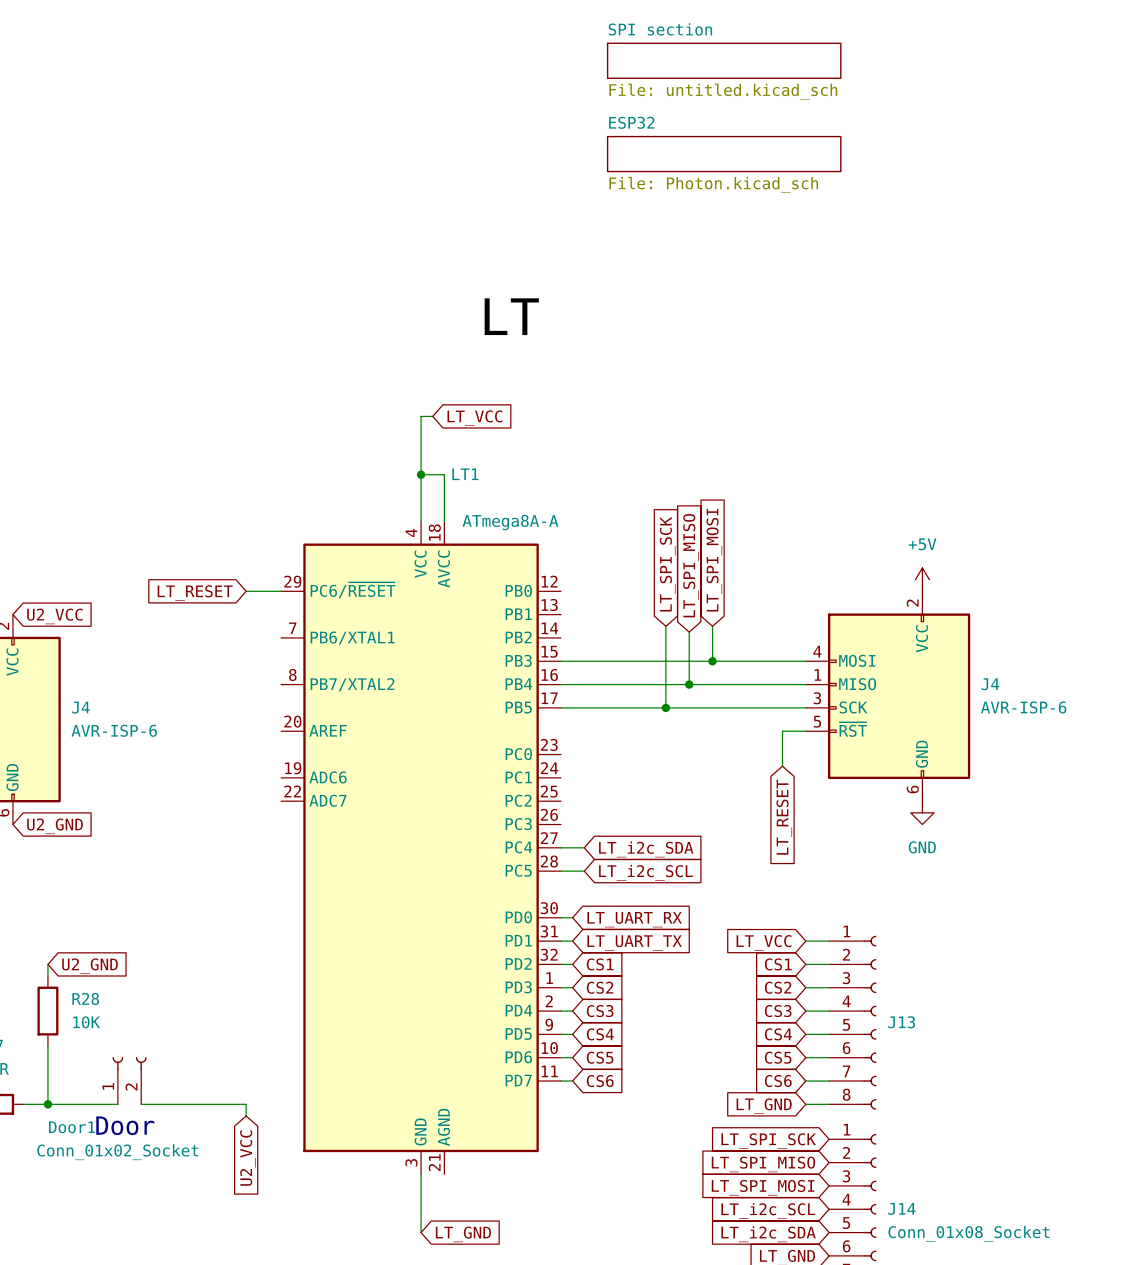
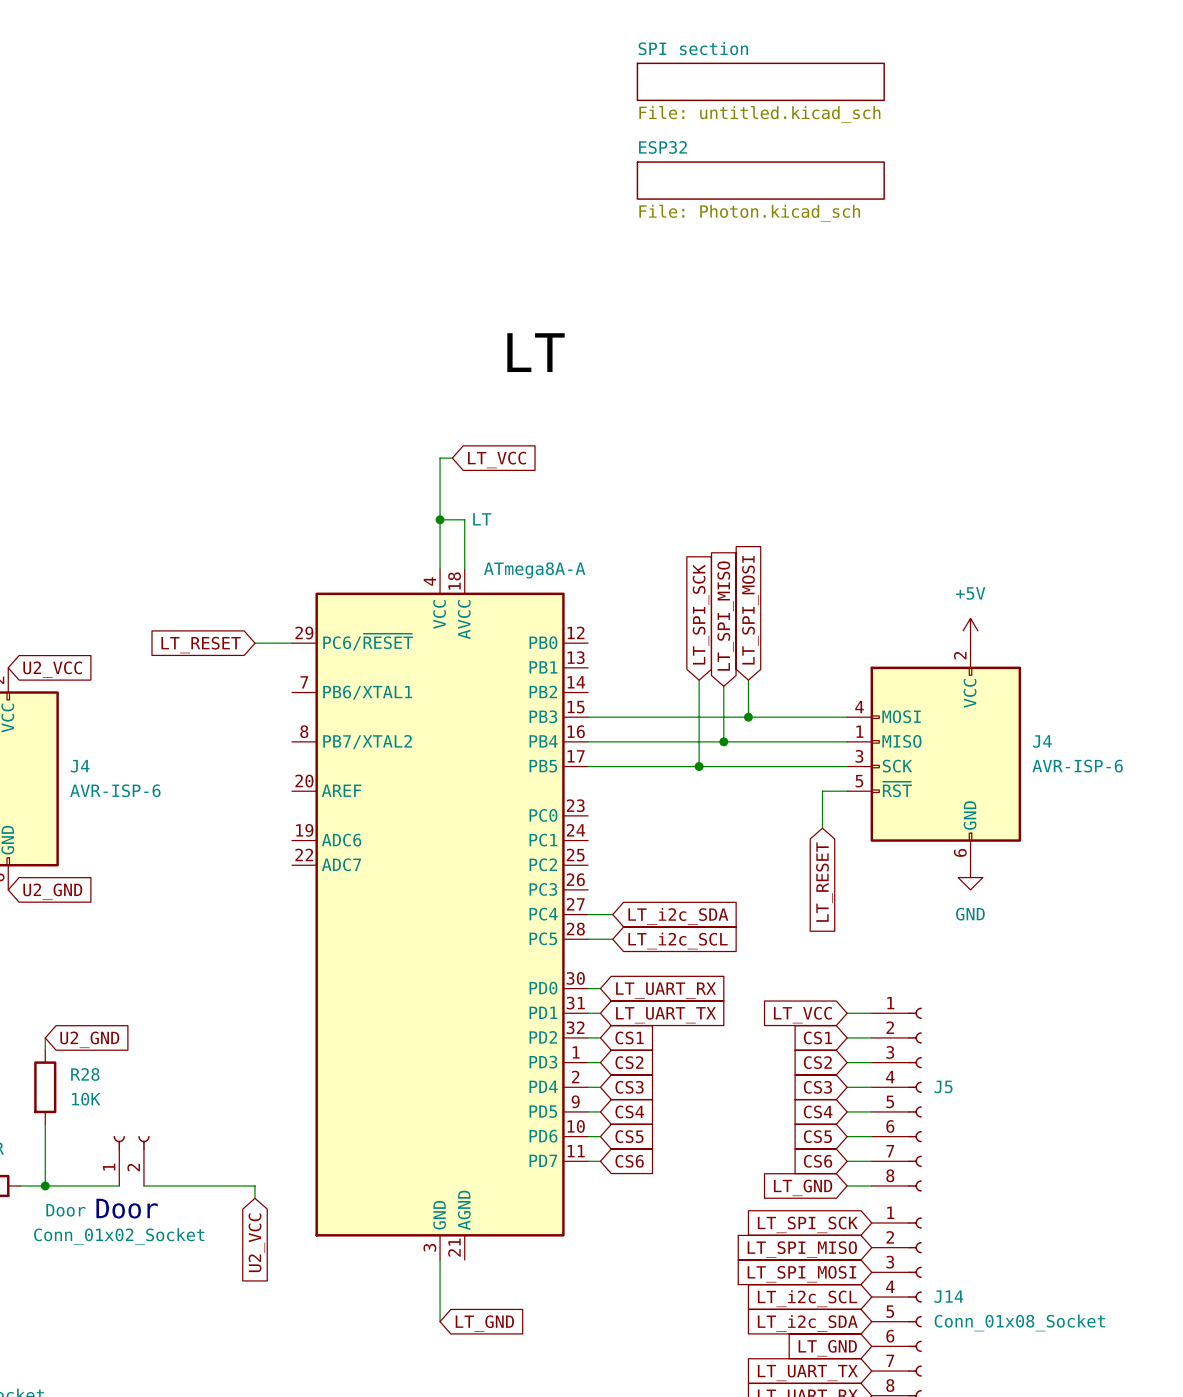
LT1 name: LT1 (465, 474) -> LT (482, 519)
J13 name: J13 (901, 1022) -> J5 (943, 1086)
Door1 name: Door1 (72, 1127) -> Door (65, 1210)

